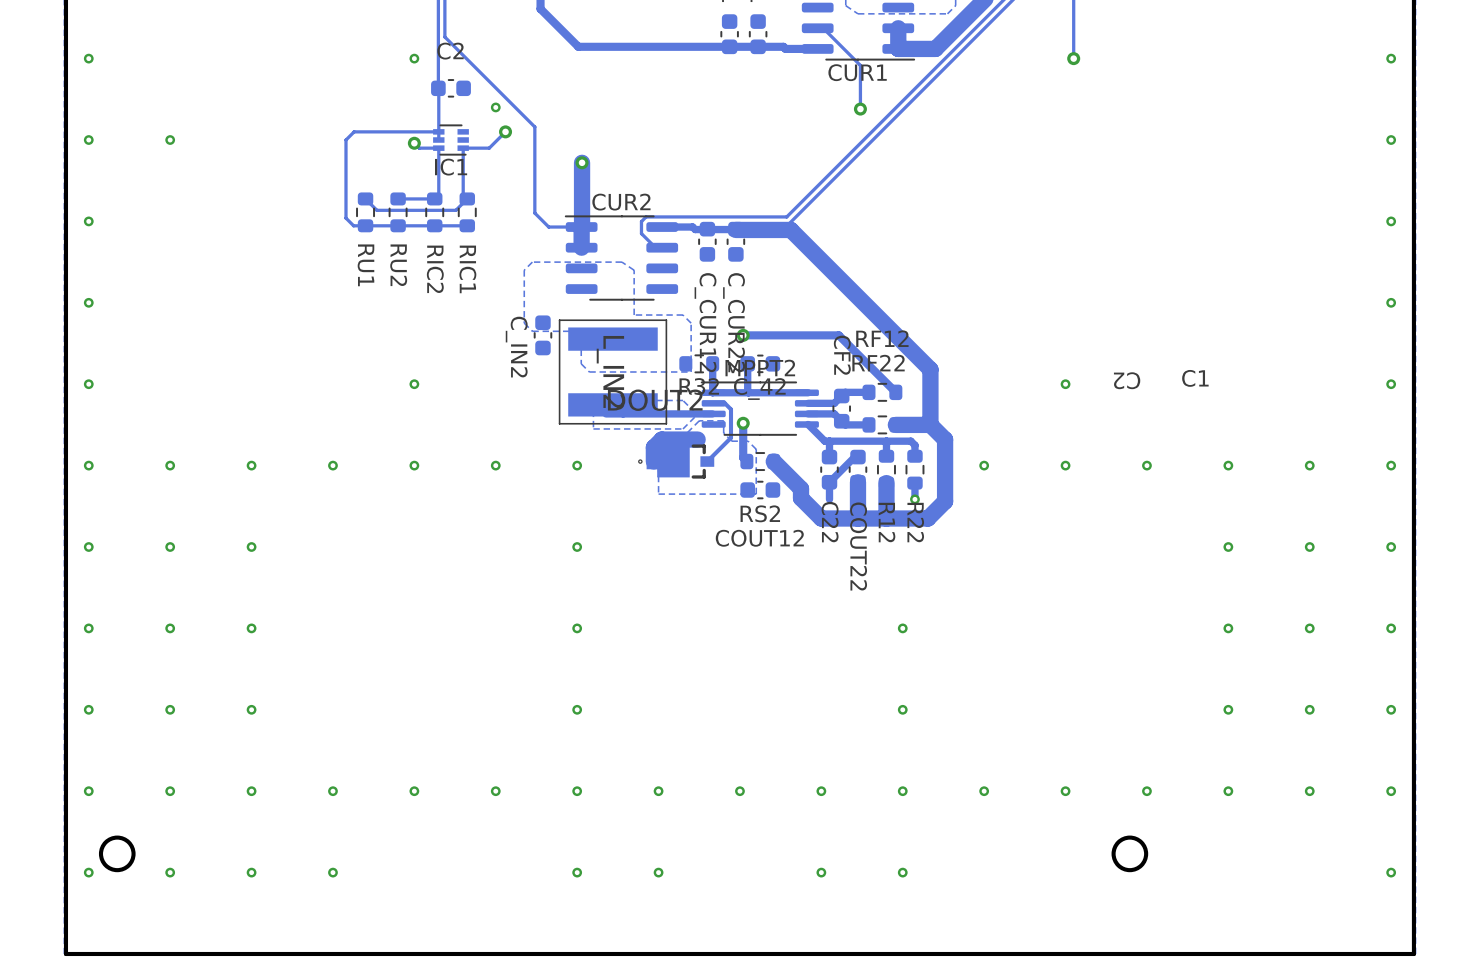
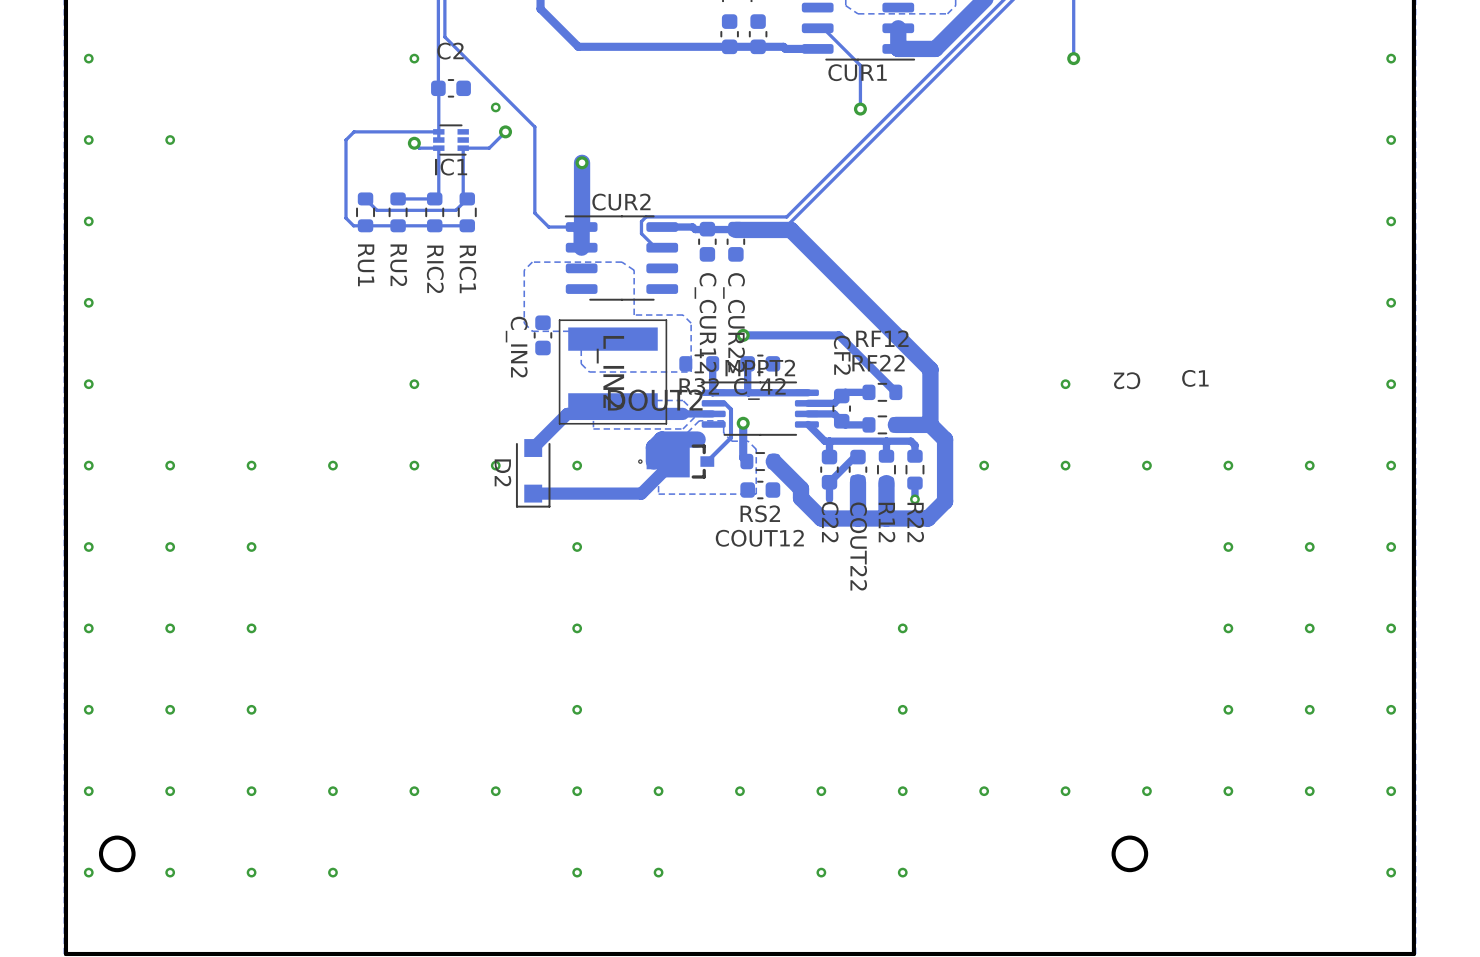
track: none -> (683, 413) (567, 413) (533, 448)
track: none -> (673, 461) (641, 493) (533, 493)
D2: none -> (533, 473)

